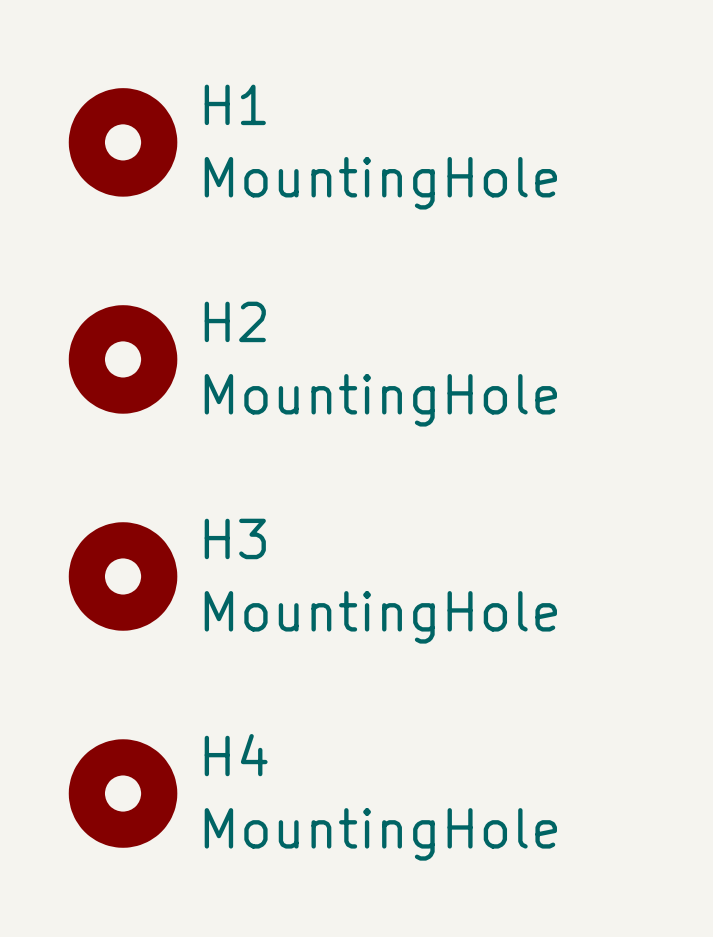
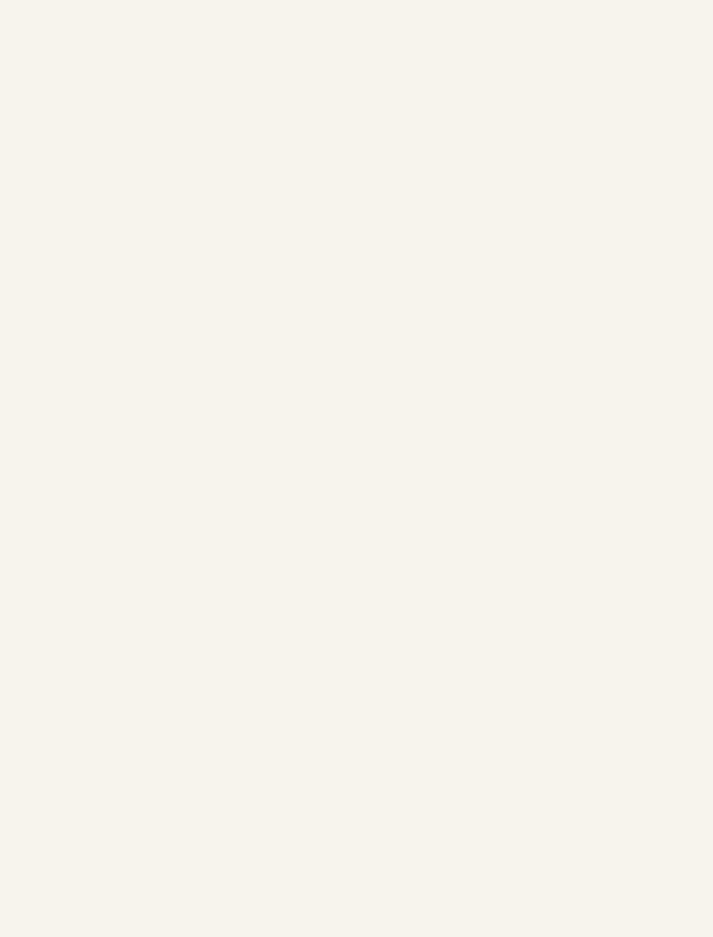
H1: MountingHole (123, 142) -> none
H2: MountingHole (123, 359) -> none
H3: MountingHole (123, 576) -> none
H4: MountingHole (123, 793) -> none

